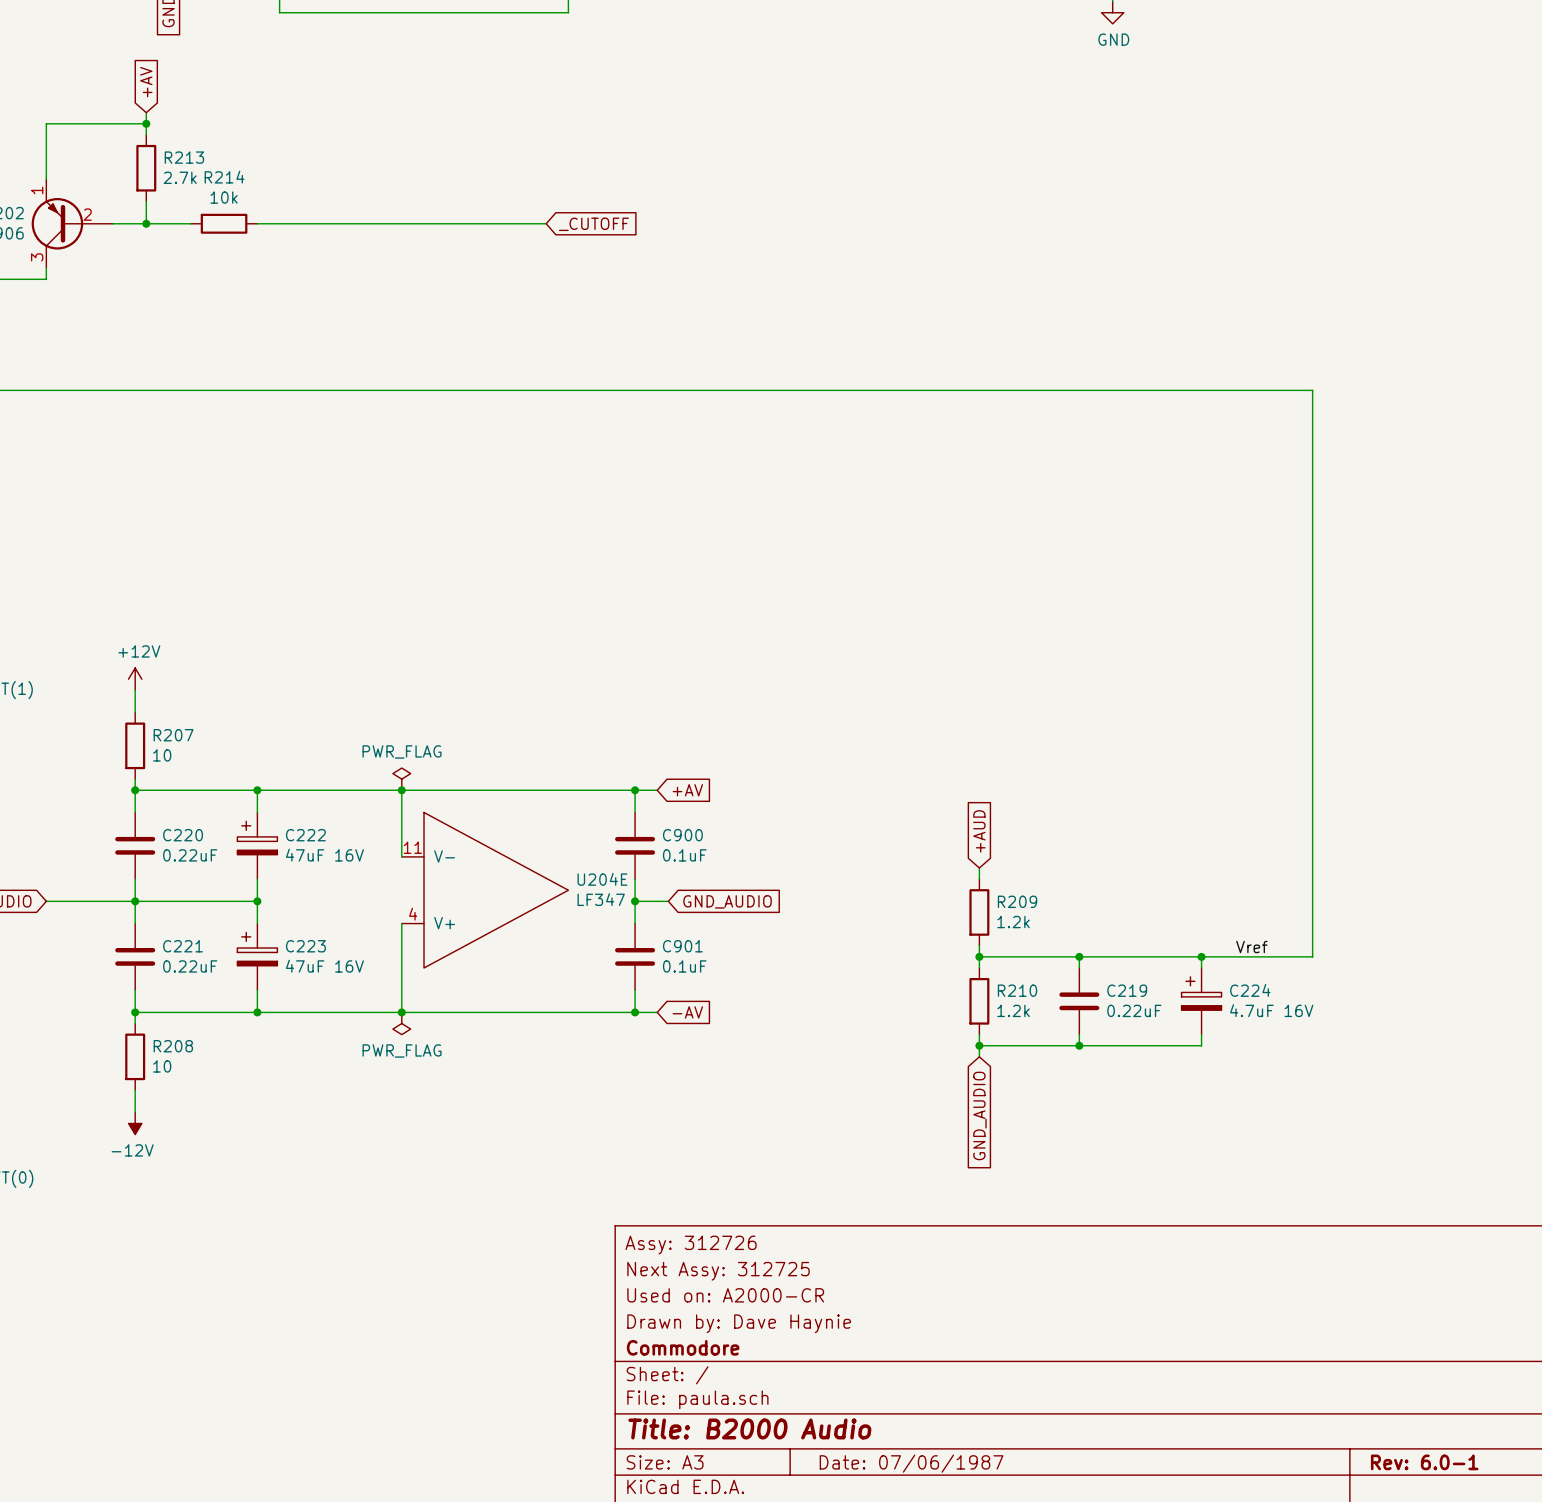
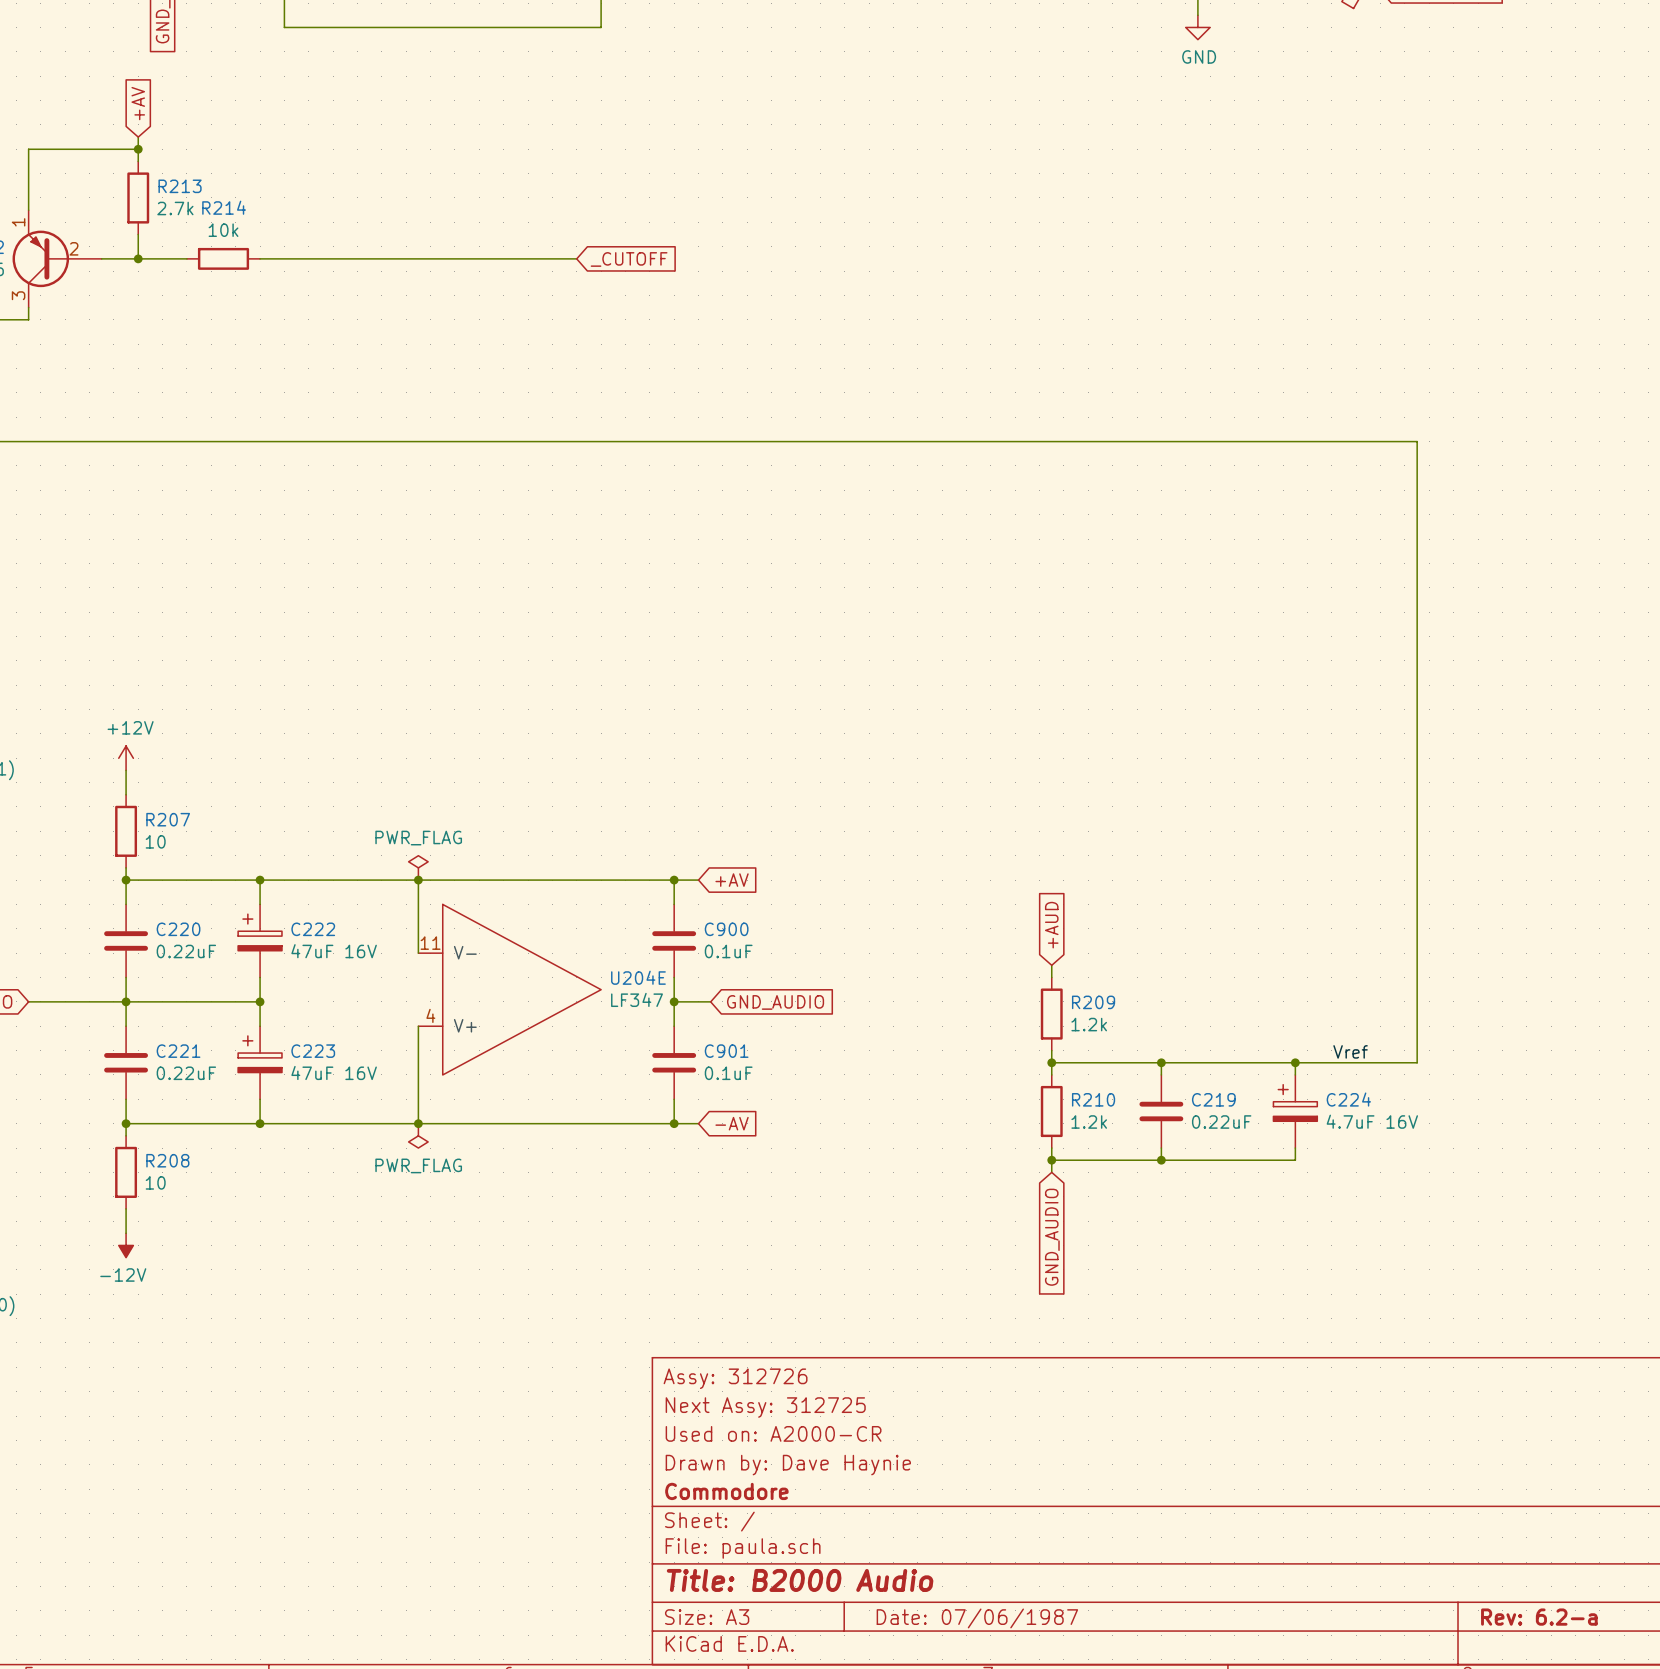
title block: Rev: 6.0-1 (1424, 1462) -> Rev: 6.2-a (1539, 1617)

